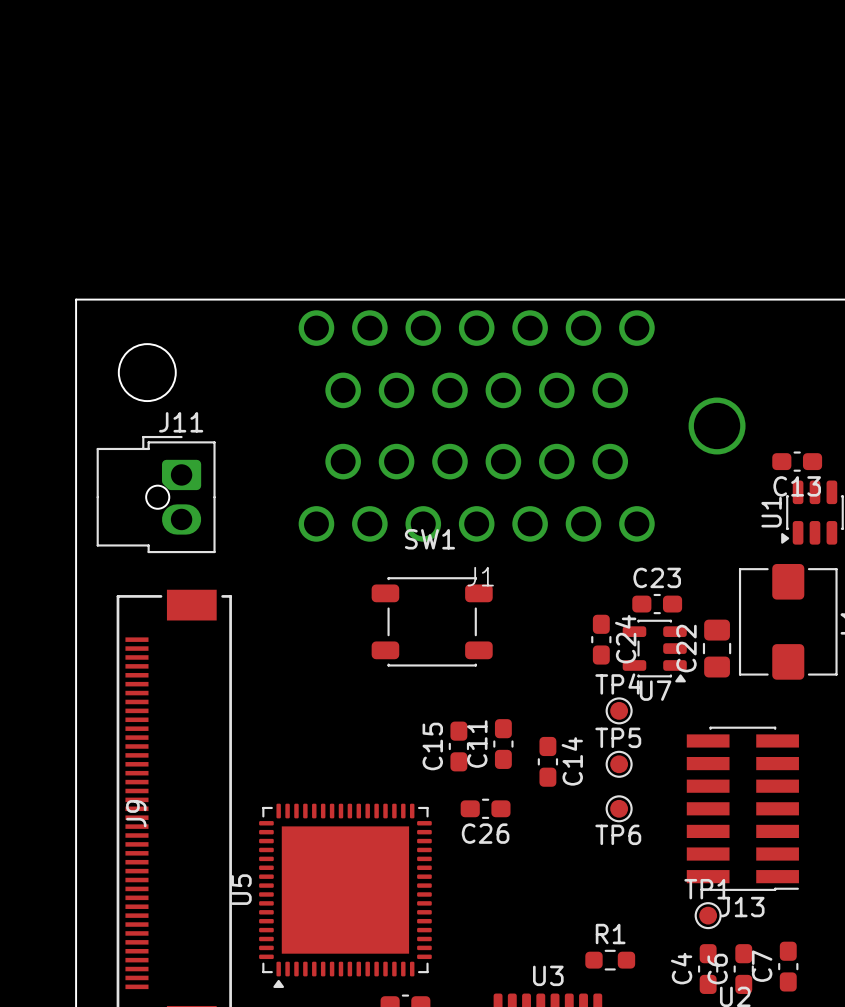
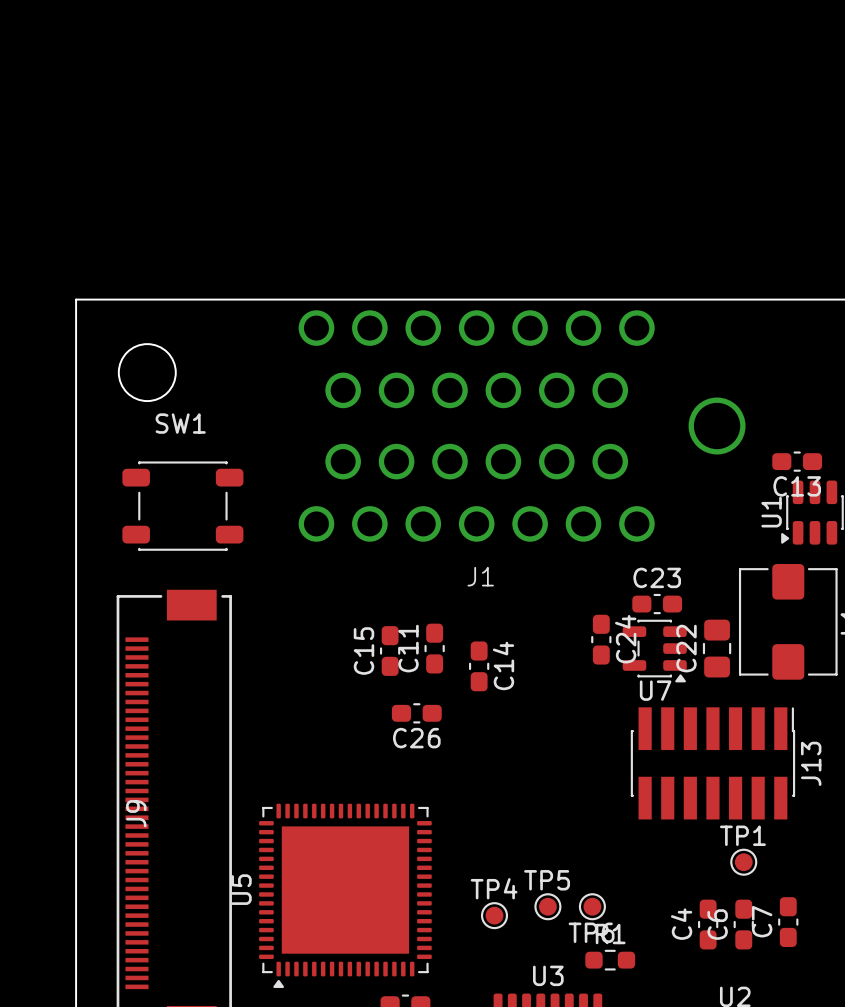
J11: (156, 494) -> none
SW1 position: (432, 621) -> (182, 506)
TP4 position: (619, 710) -> (494, 915)
C11 position: (503, 744) -> (434, 648)
C15 position: (458, 746) -> (390, 651)
C14 position: (547, 761) -> (479, 666)
TP5 position: (619, 764) -> (547, 906)
C26 position: (485, 808) -> (416, 713)
TP6 position: (619, 808) -> (592, 906)
J13 rotation: 0° (742, 808) -> 90° counterclockwise (712, 763)
TP1 position: (708, 915) -> (743, 862)
C7 position: (788, 966) -> (788, 922)
C4 position: (708, 969) -> (708, 924)
C6 position: (743, 969) -> (743, 924)

